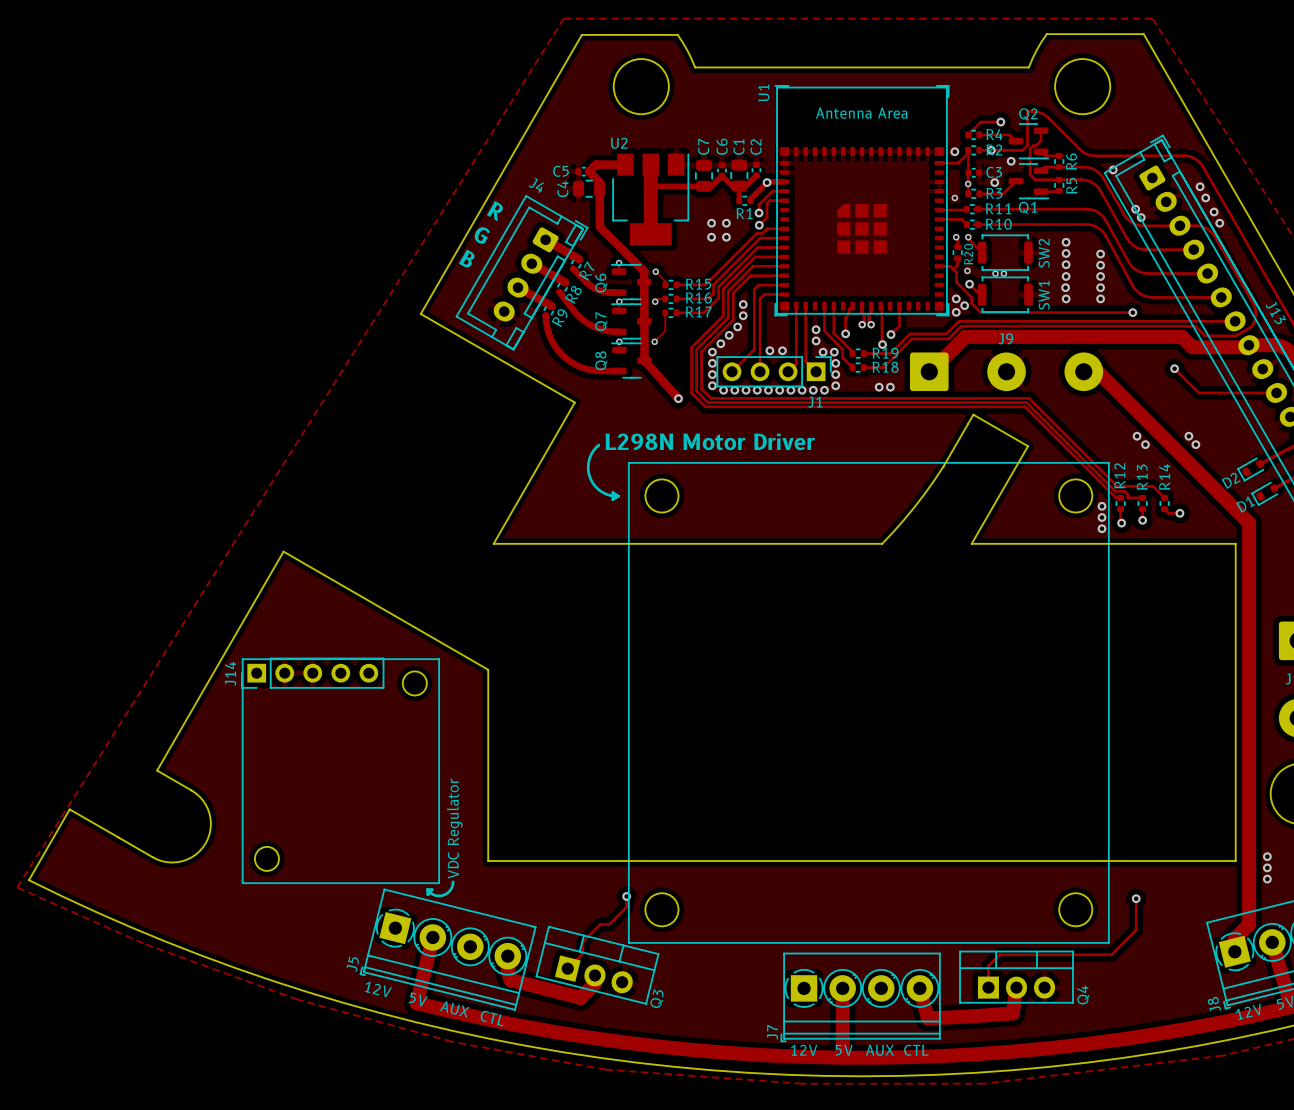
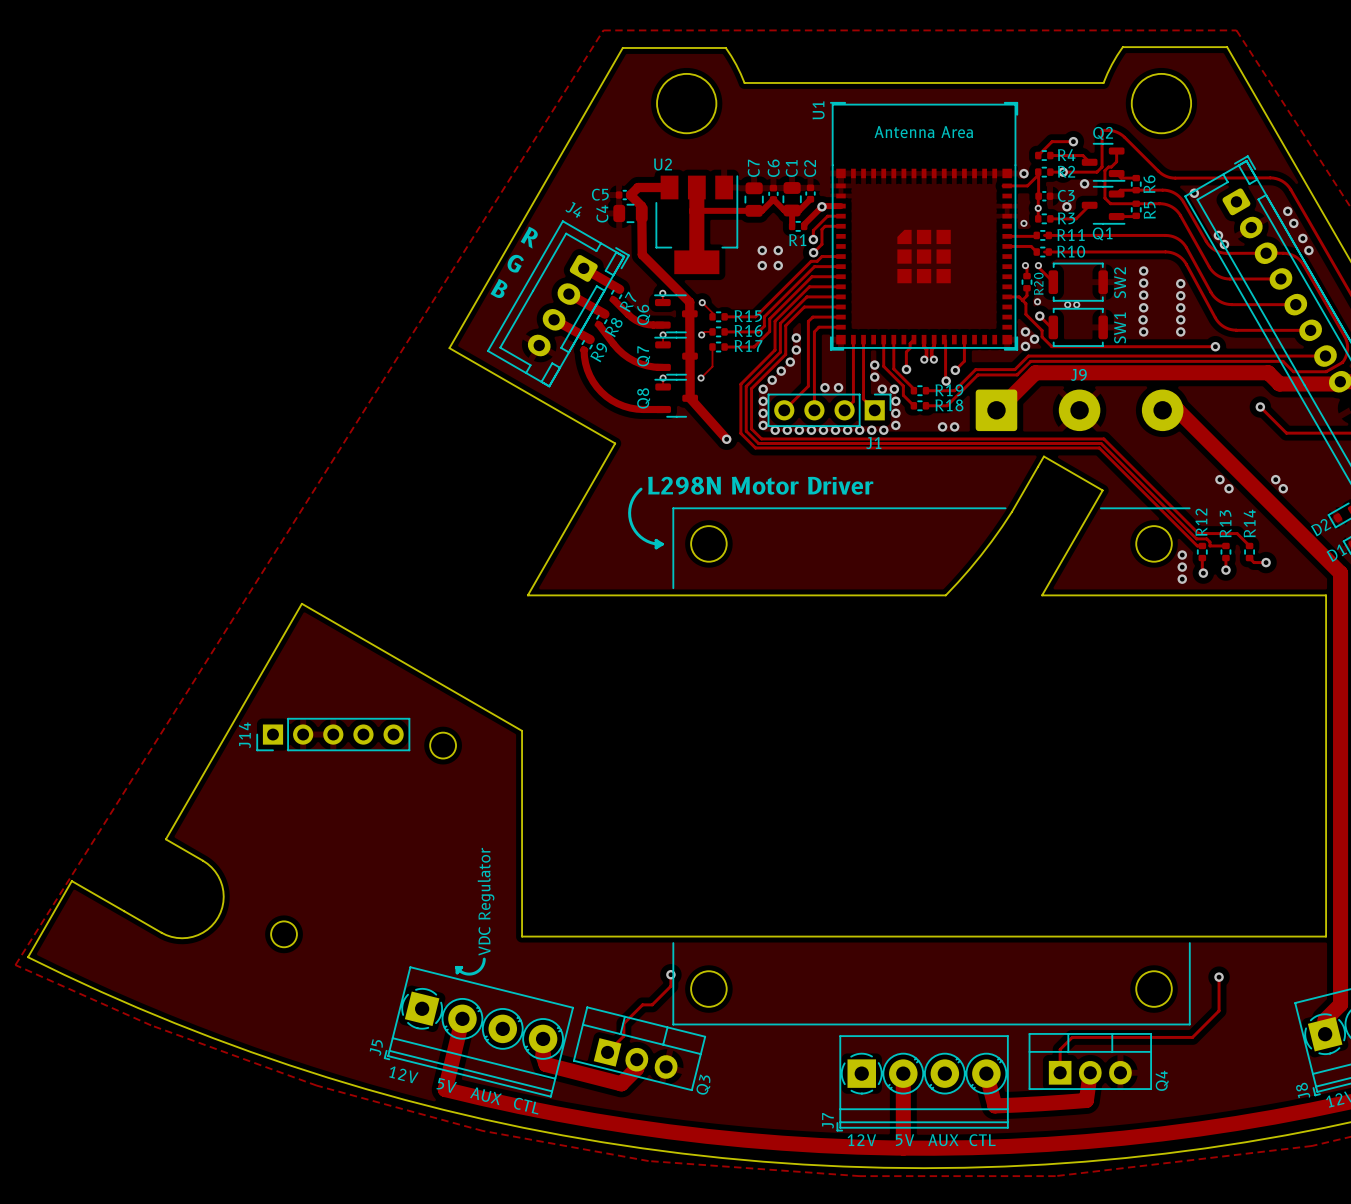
line: (628, 462) (628, 942) (1108, 942) (1108, 462) -> (673, 508) (673, 588)
line: (937, 462) (1026, 462) -> none
line: (242, 659) (439, 659) (439, 883) (242, 883) (242, 659) -> none

